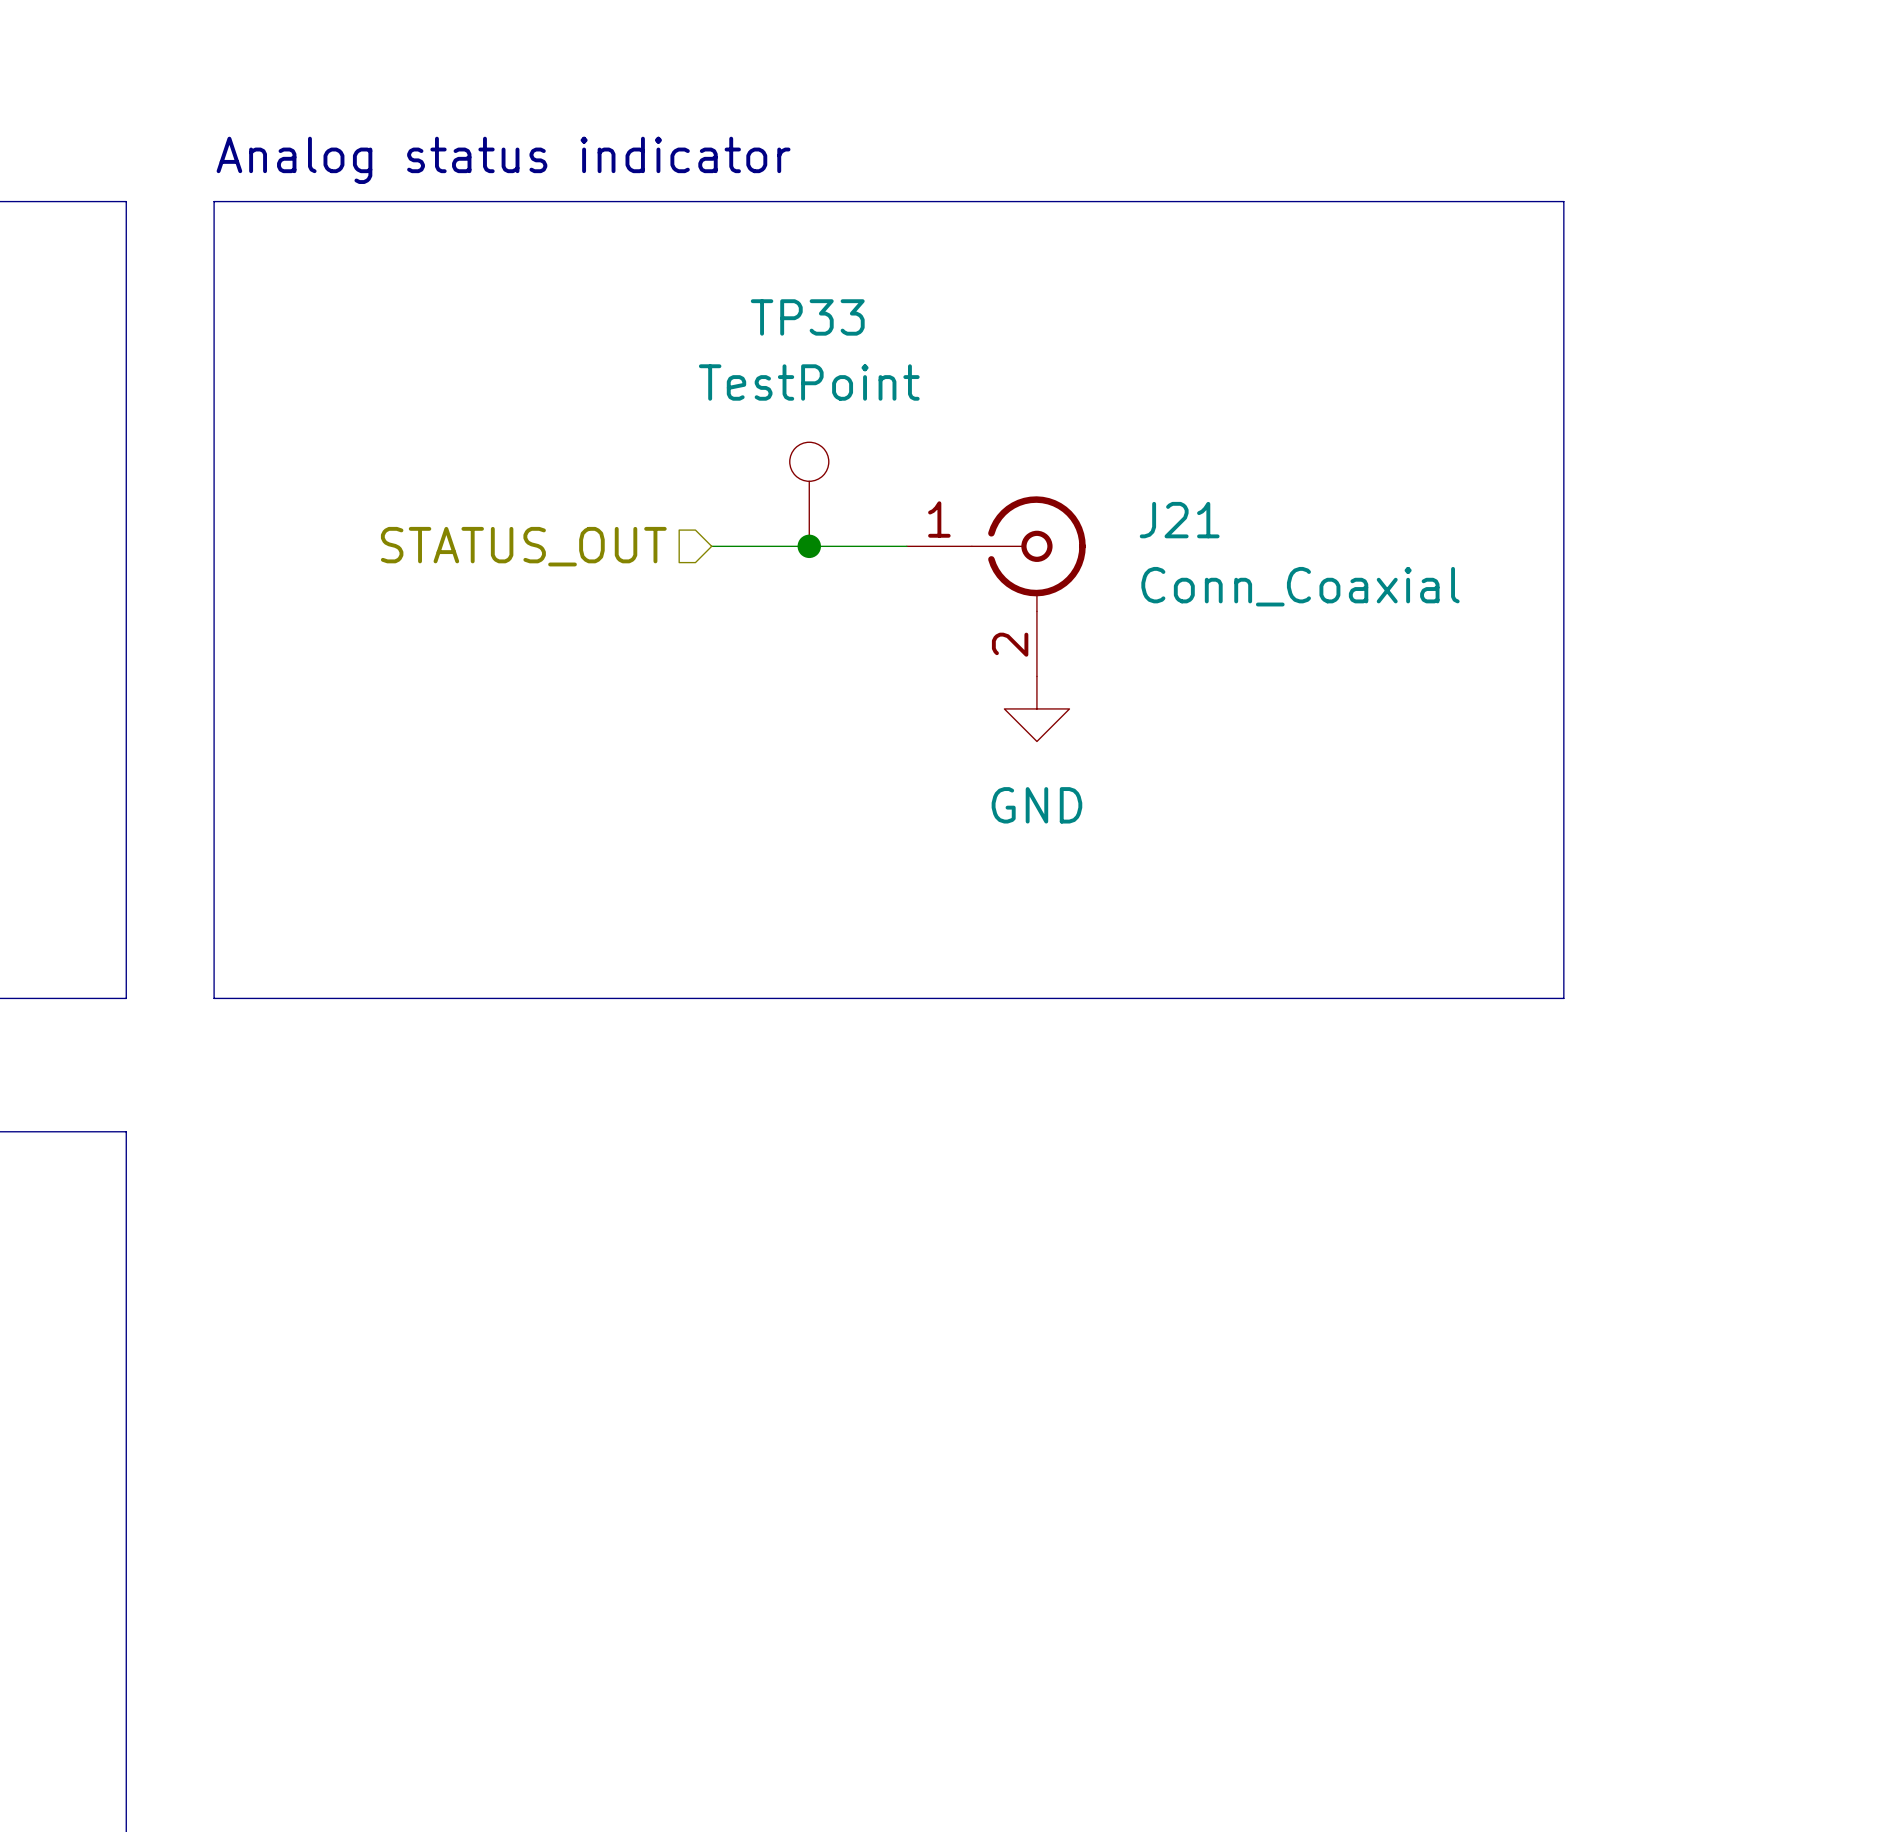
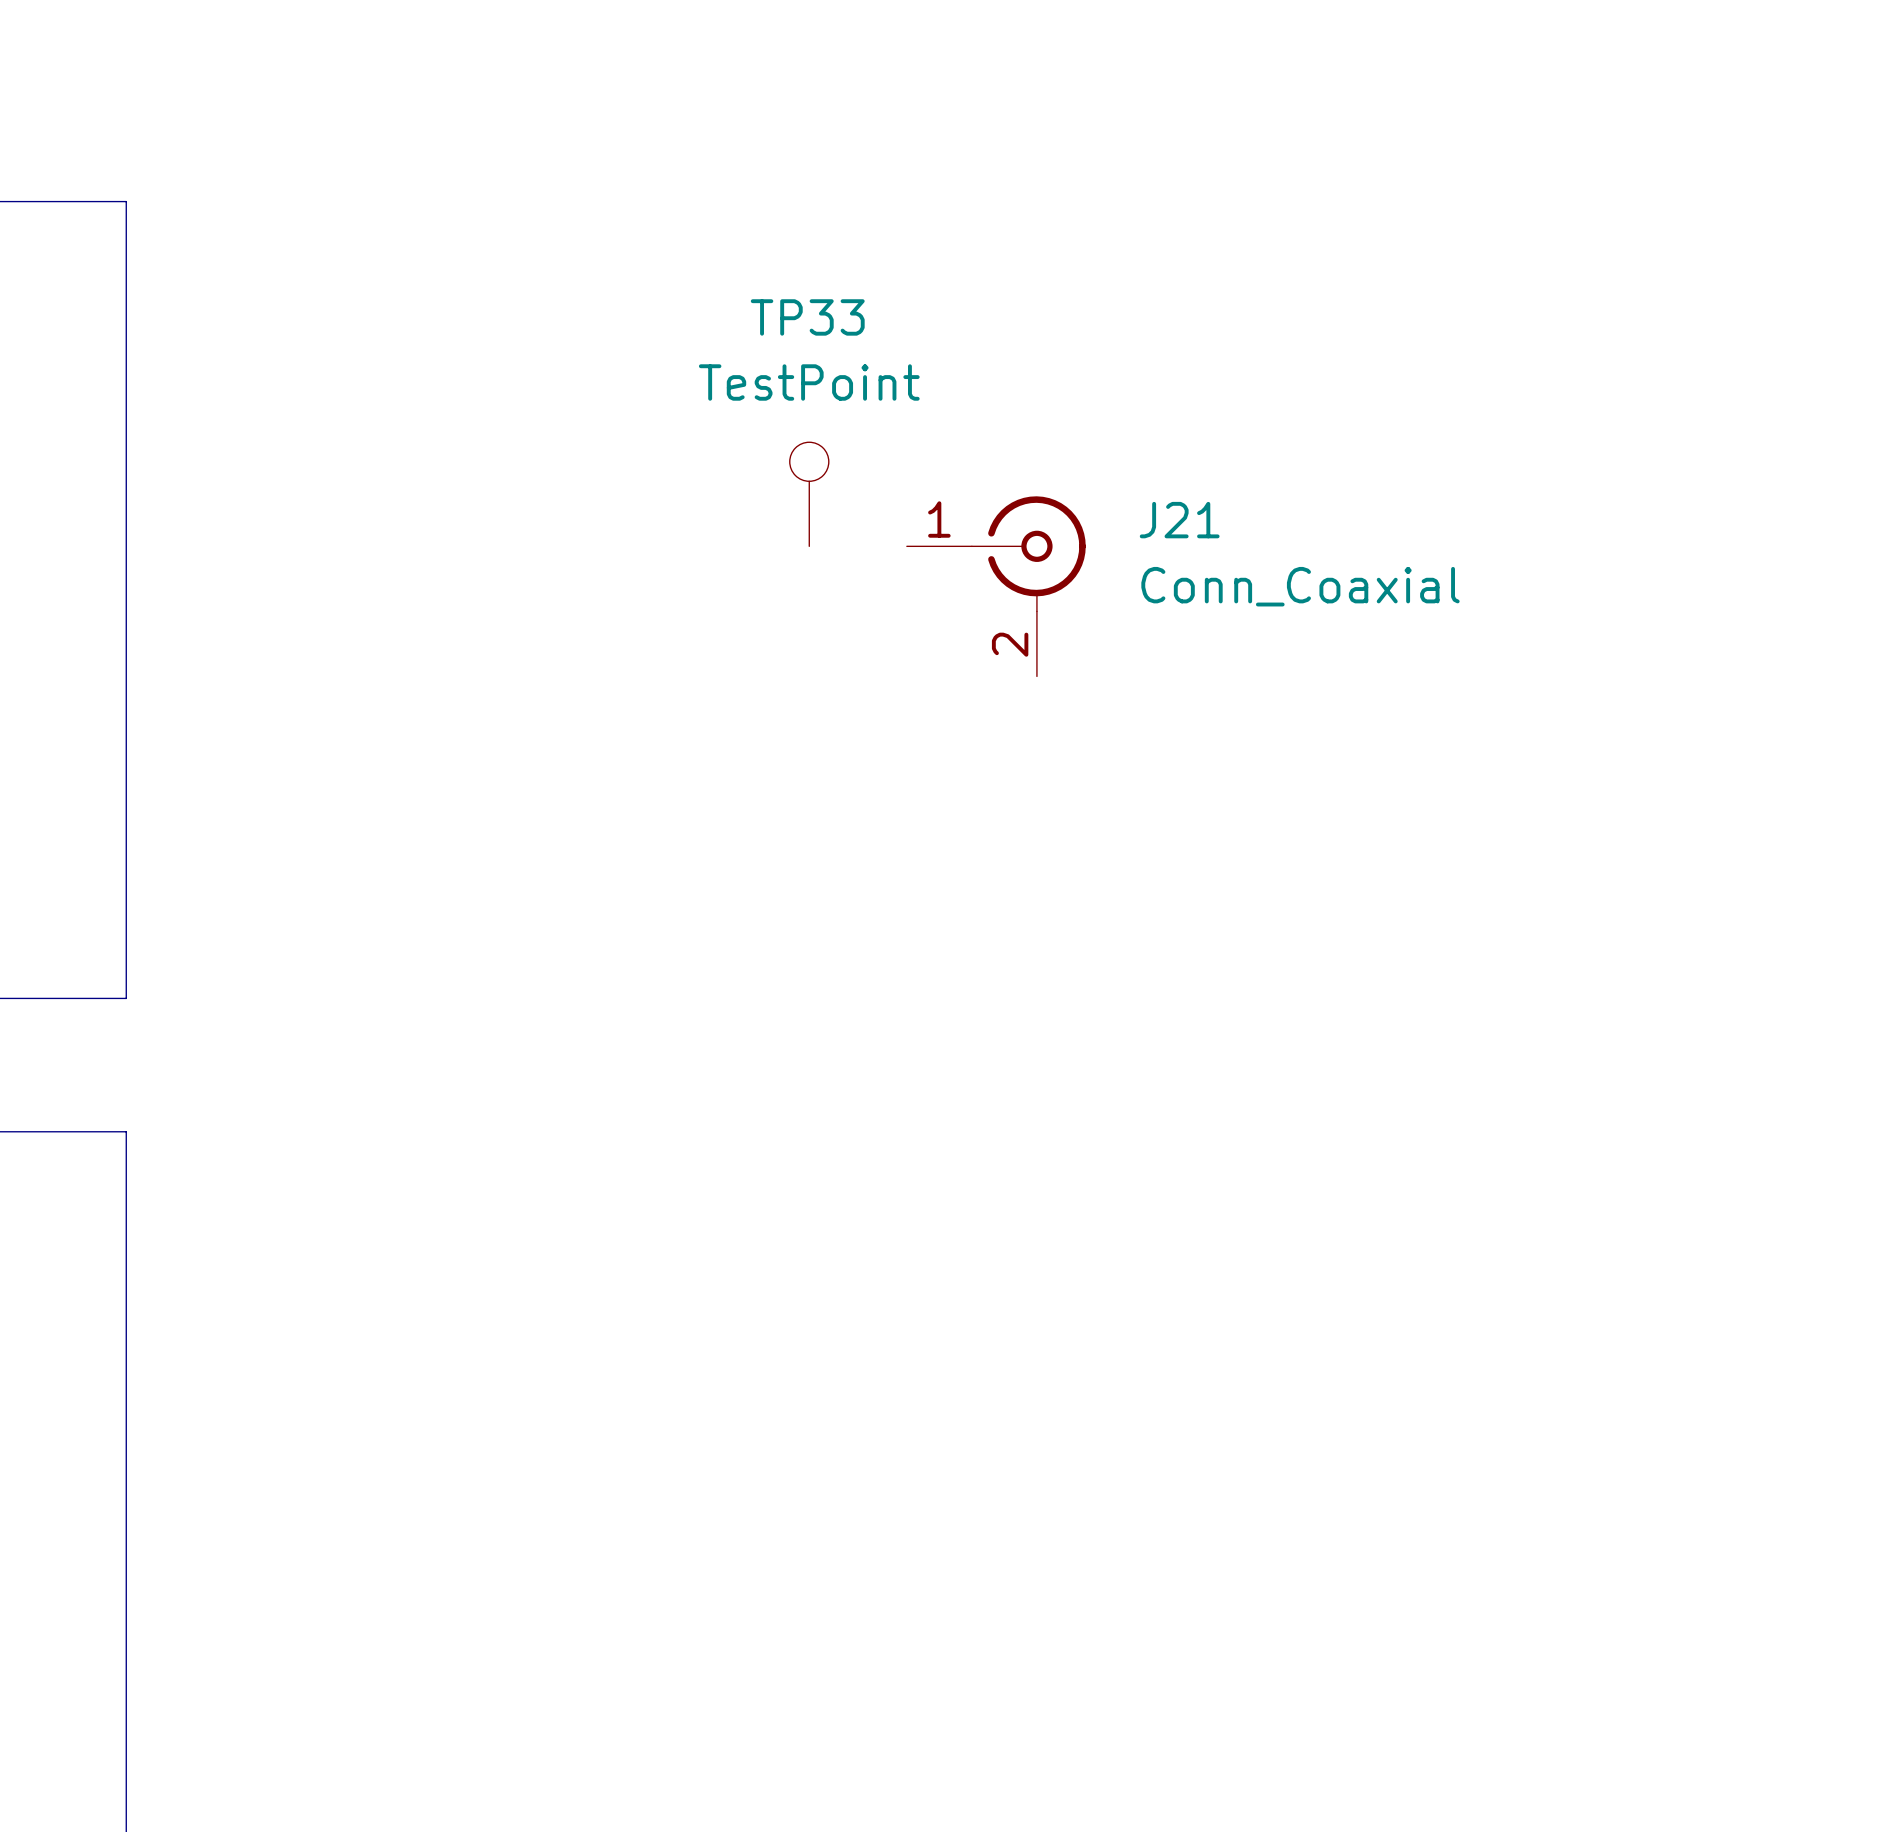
text: Analog status indicator (503, 160) -> none
line: (214, 201) (1563, 201) (1563, 998) (214, 998) (214, 201) -> none
hierarchical label: STATUS_OUT (523, 546) -> none
wire: (711, 546) (906, 546) -> none
junction: (809, 546) -> none
power symbol: GND (1036, 708) -> none

